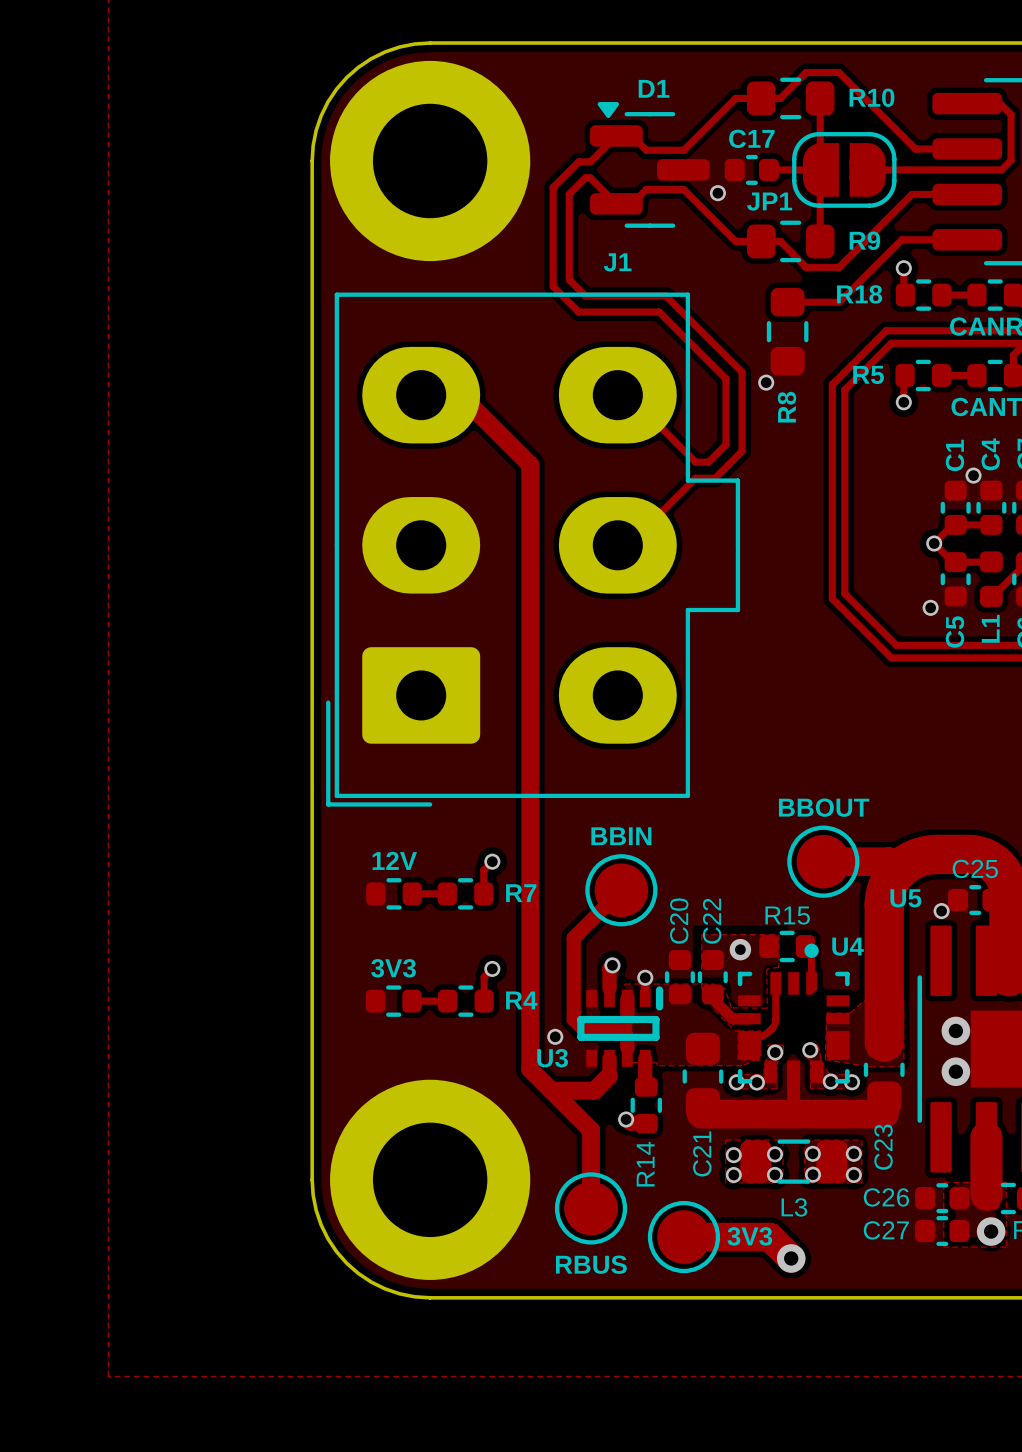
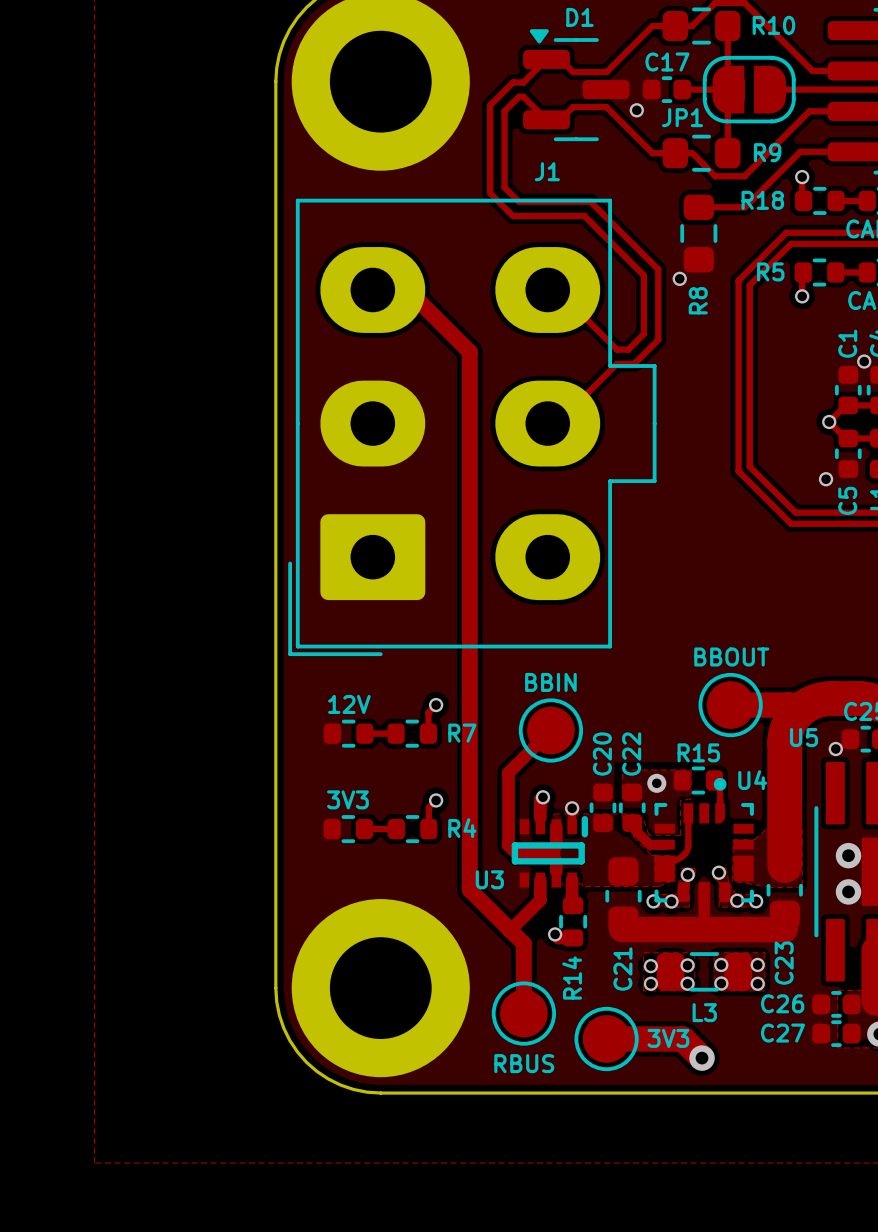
via: (555, 1036) -> none
track: (609, 1075) (594, 1090) (551, 1090) -> (540, 895) (540, 900) (510, 930)

